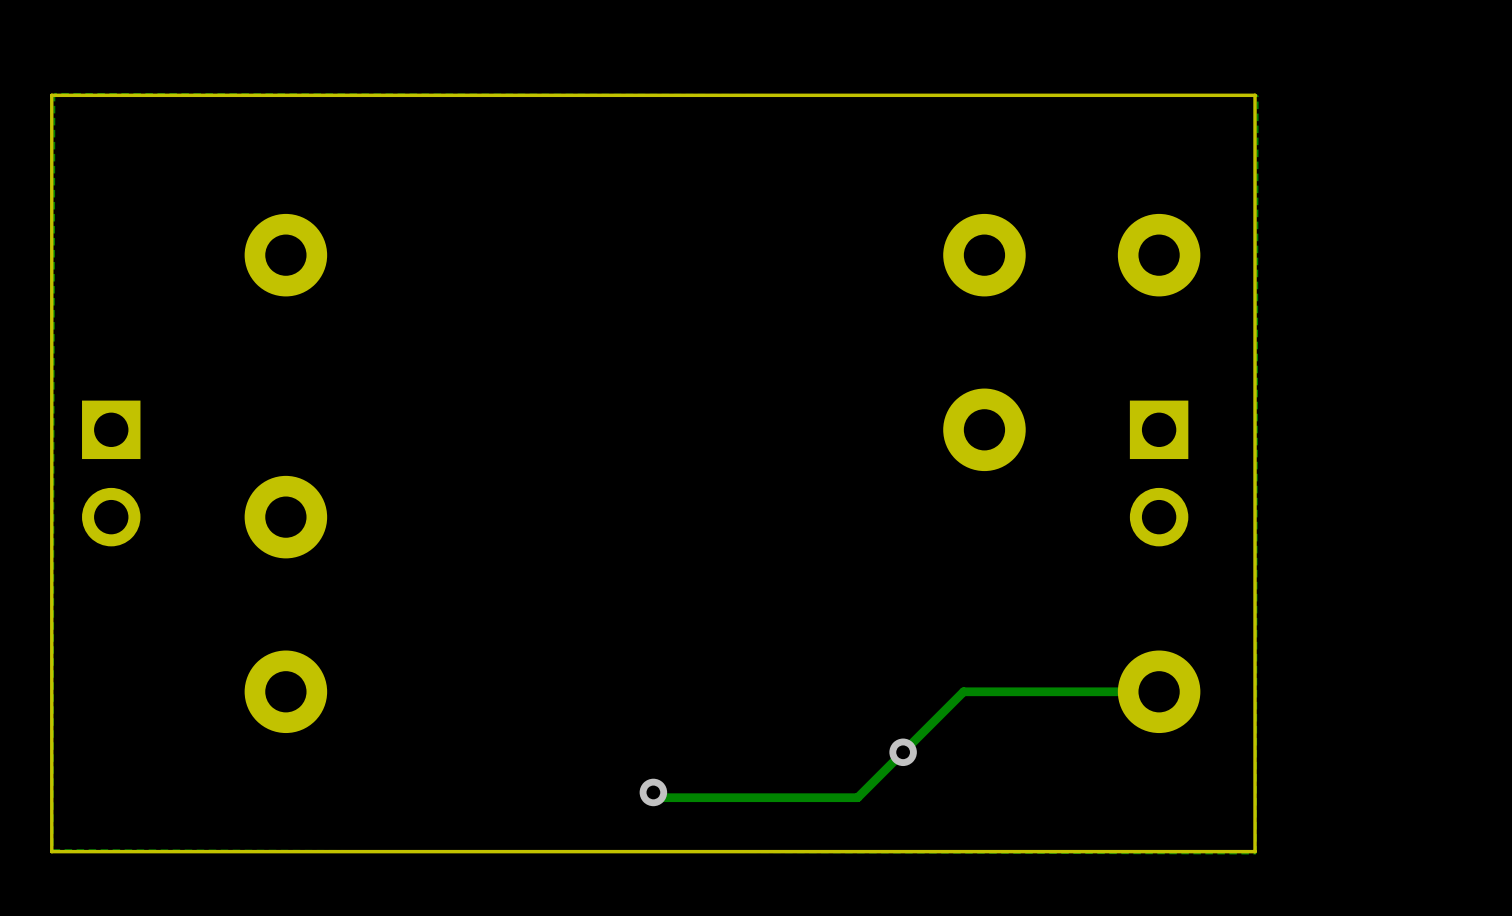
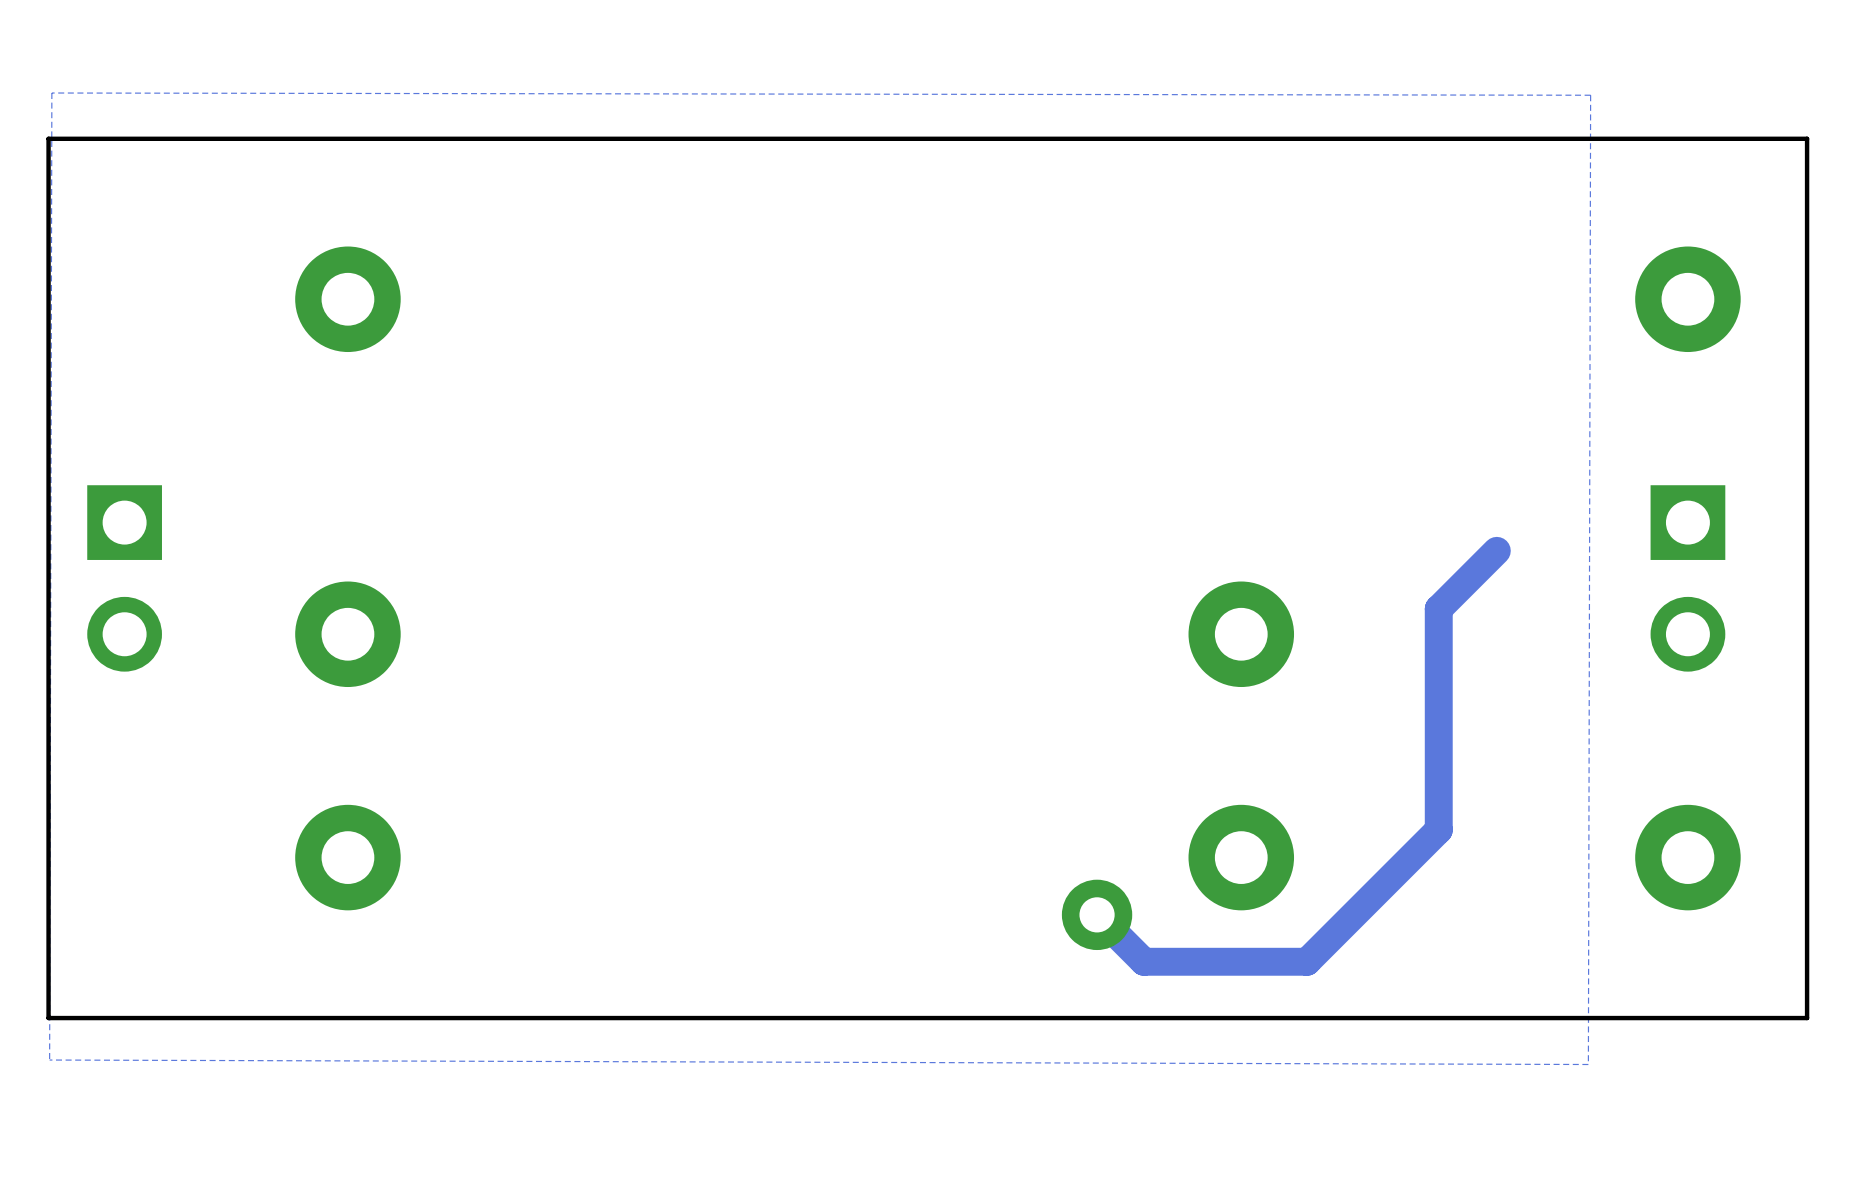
board edge: (51, 129) (51, 95) (1255, 95) (1255, 851) (51, 851) (51, 817) -> (48, 138) (1807, 138) (1807, 1018) (48, 1018)
part: (984, 255) -> none
part: (1159, 255) -> none
part: none -> (1687, 299)
part position: (984, 429) -> (1241, 634)
track: none -> (1496, 550) (1438, 608) (1438, 830) (1306, 961) (1143, 961) (1097, 914)
part position: (1159, 473) -> (1687, 578)
part: none -> (1241, 857)
track: (1159, 691) (963, 691) (857, 797) (658, 797) (653, 792) -> none
part: (1159, 691) -> none
part: none -> (1687, 857)
via: none -> (1097, 914)
via: (903, 752) -> none
via: (653, 792) -> none

